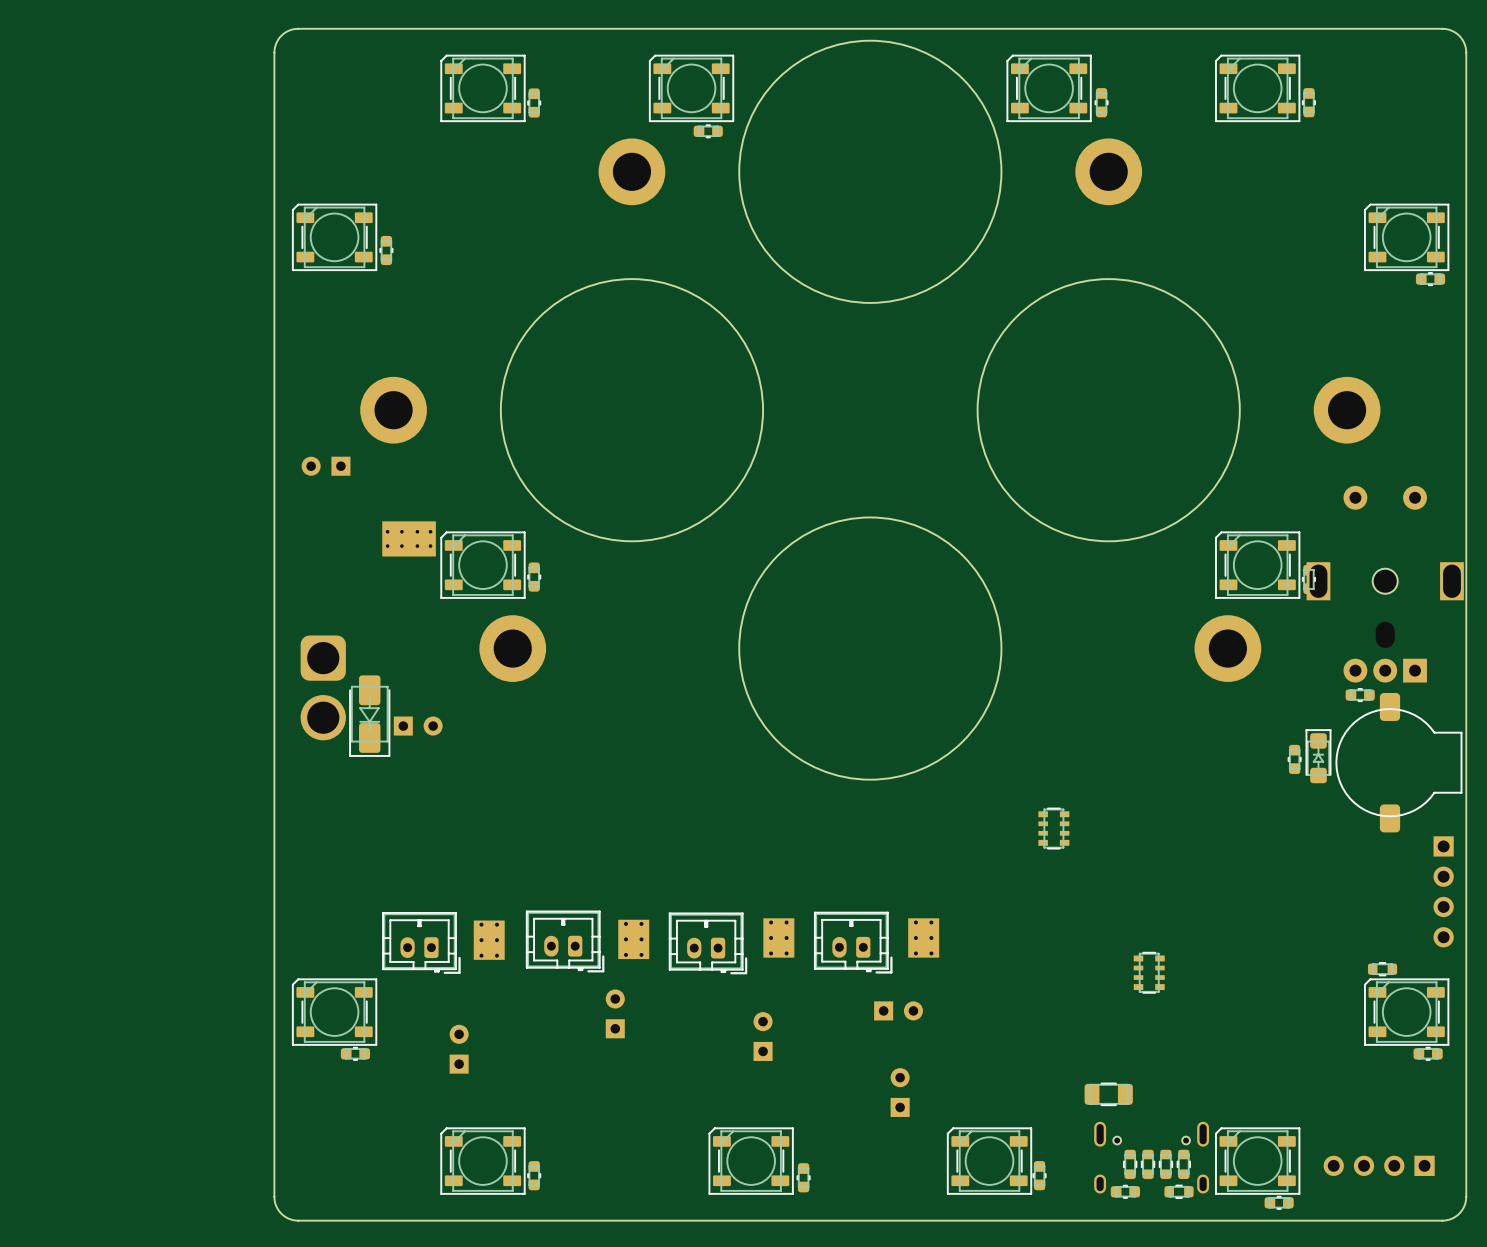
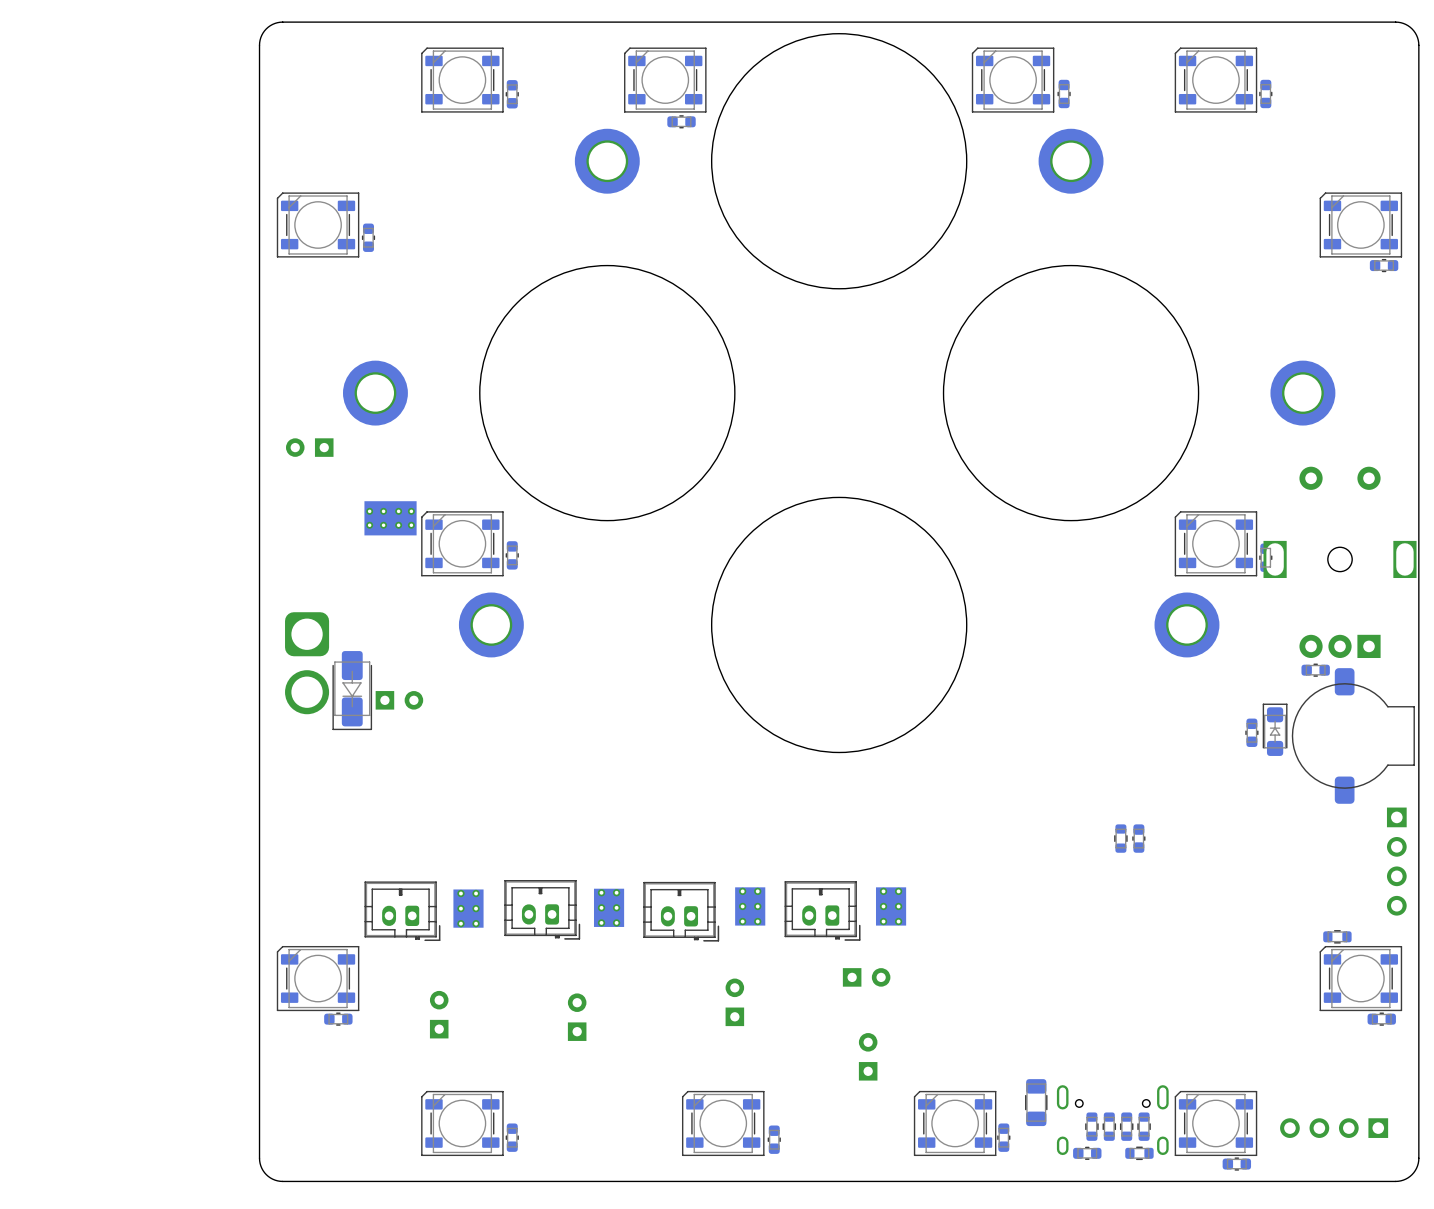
part: (1053, 828) -> none
part: none -> (1120, 838)
part: none -> (1138, 838)
part: (1149, 972) -> none
part position: (615, 1013) -> (577, 1017)
part rotation: 0° (1108, 1094) -> 90° clockwise (1036, 1102)
part position: (1108, 1094) -> (1036, 1102)

